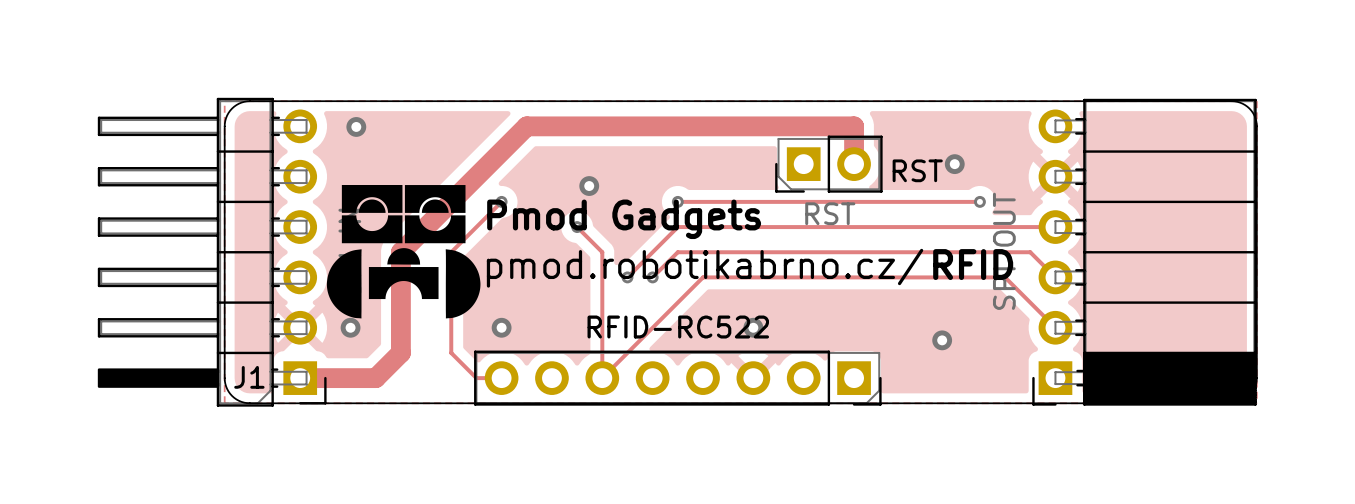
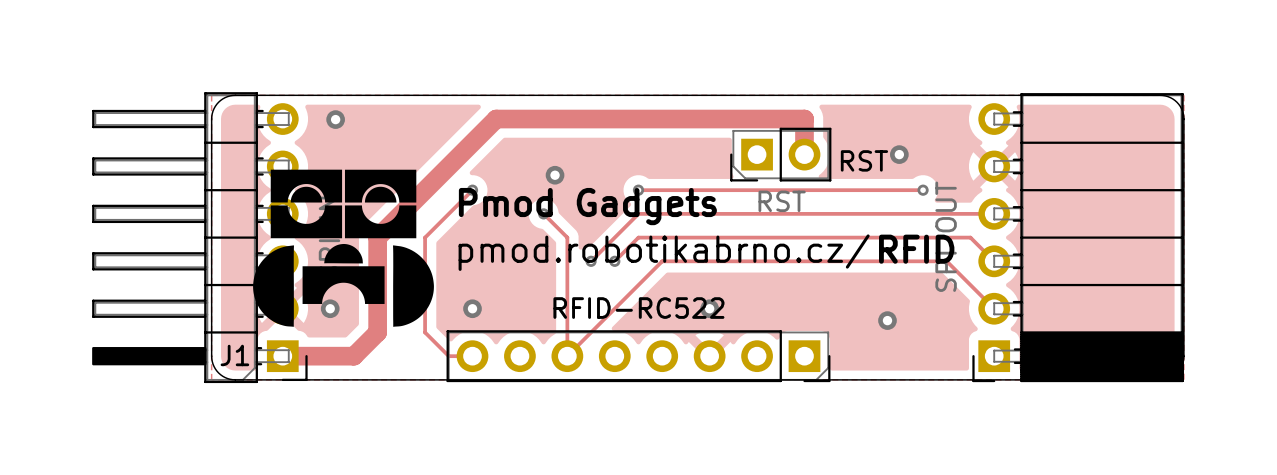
drawing: none -> [253, 169, 434, 327]
drawing: [326, 184, 481, 319] -> none

